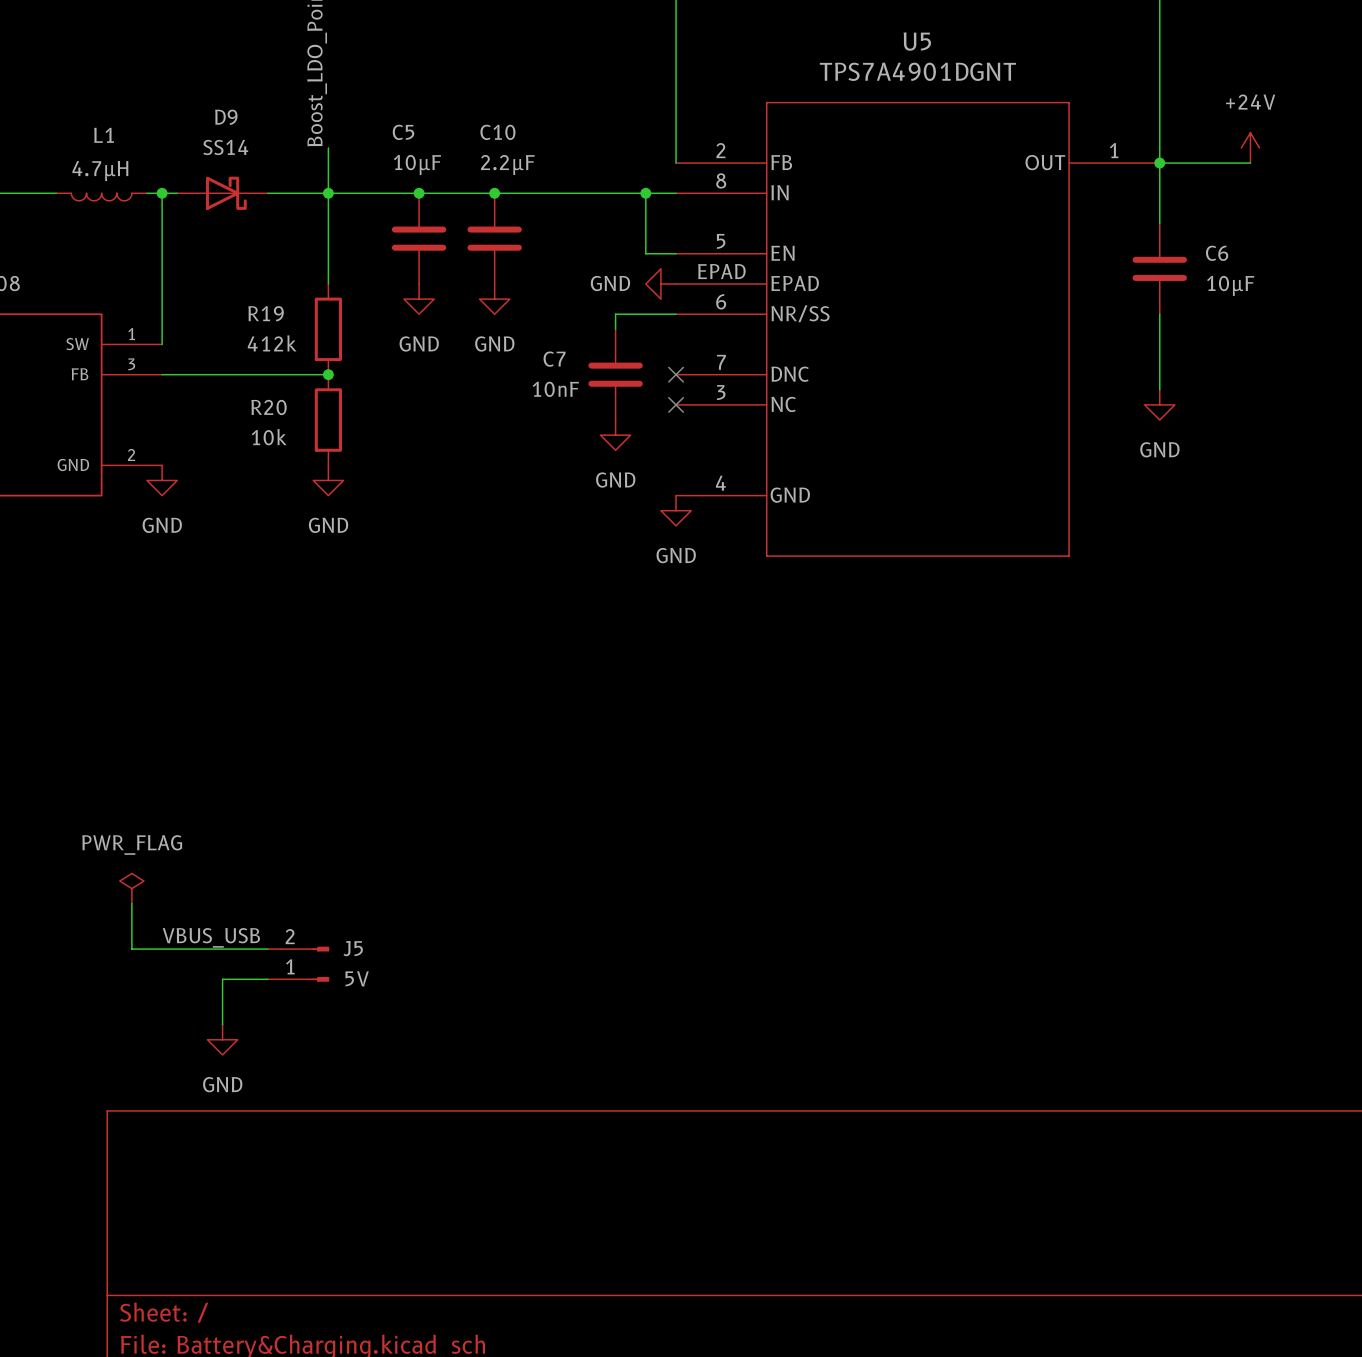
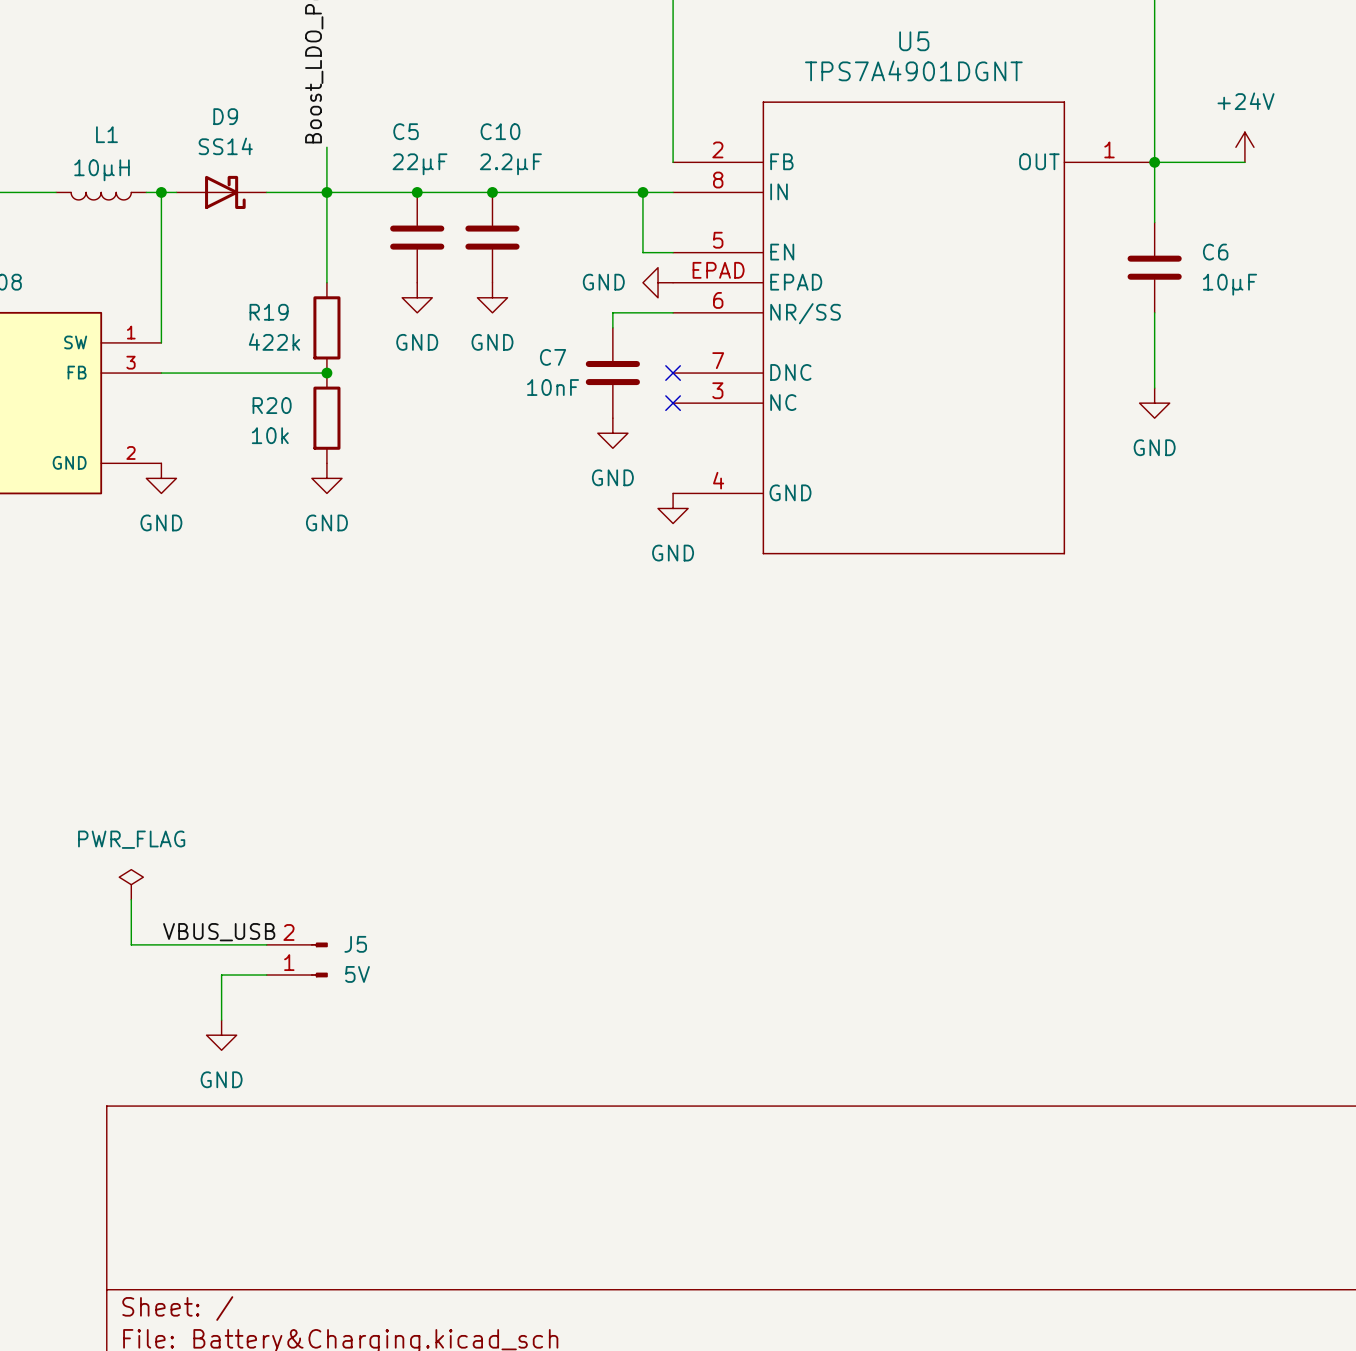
C5 value: 10µF (417, 164) -> 22µF (420, 164)
L1 value: 4.7µH (100, 171) -> 10µH (102, 170)
R19 value: 412k (272, 343) -> 422k (274, 342)

